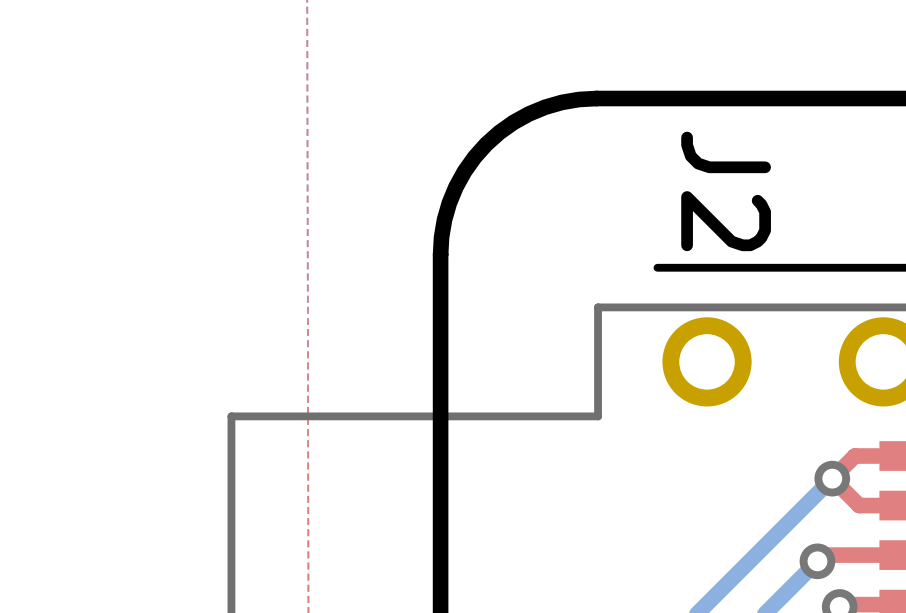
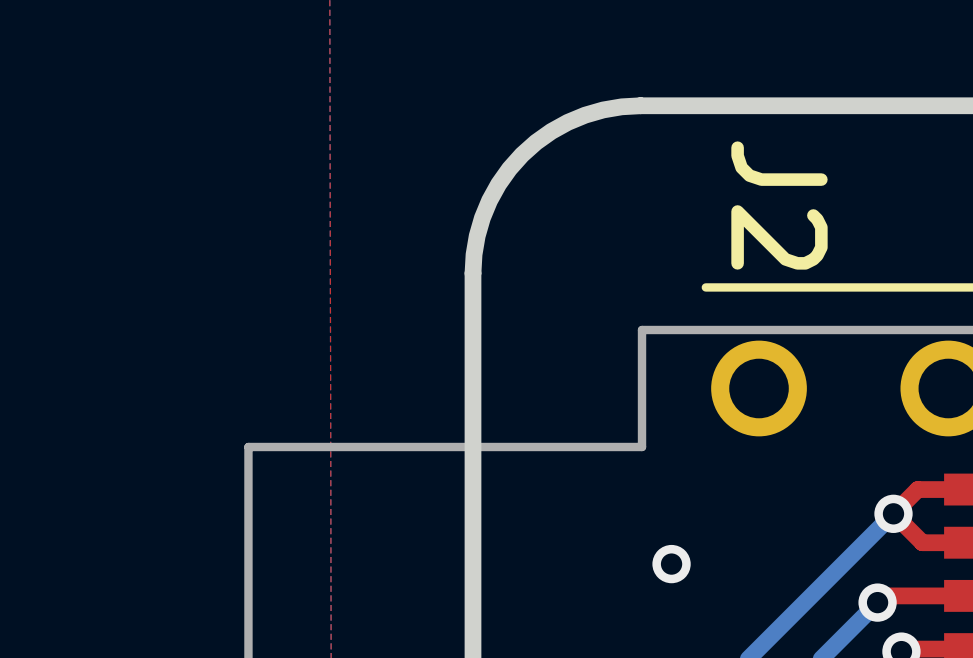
via: none -> (671, 564)

